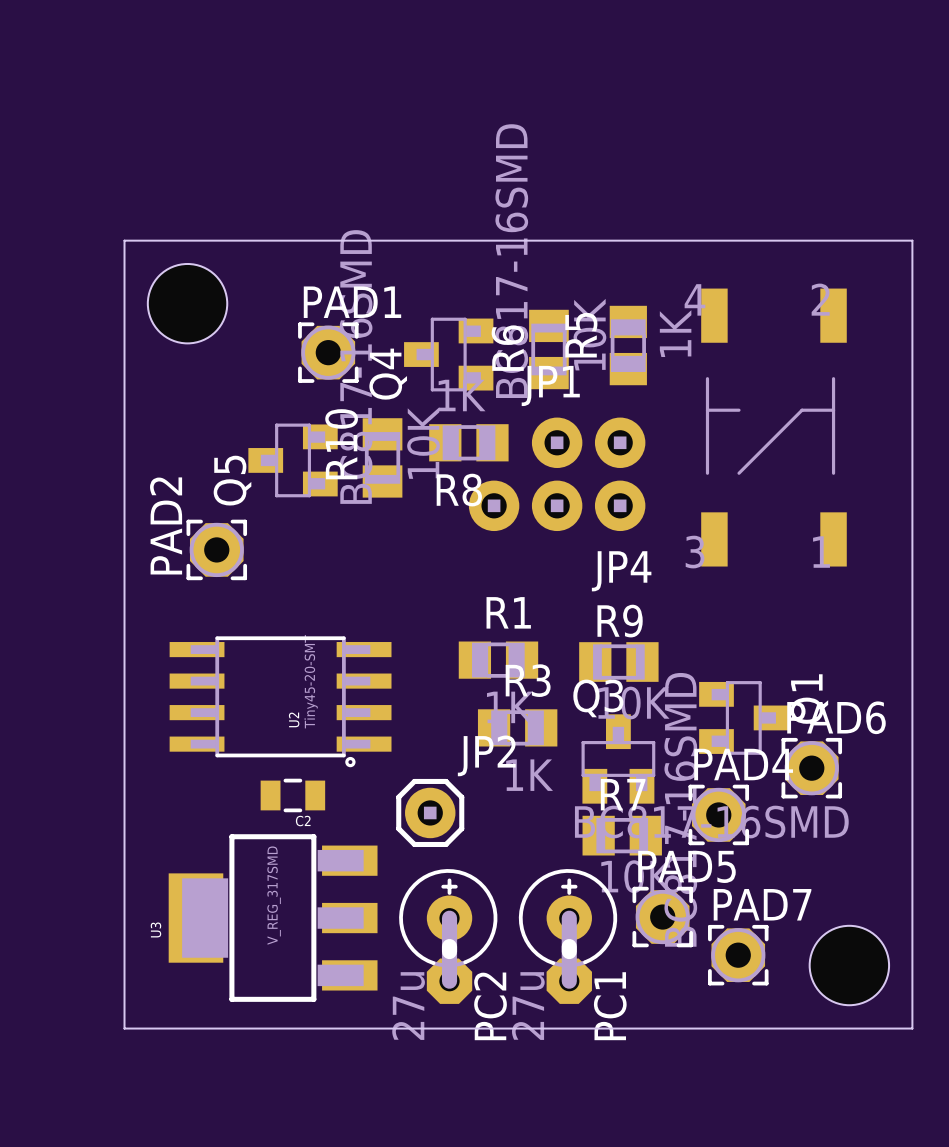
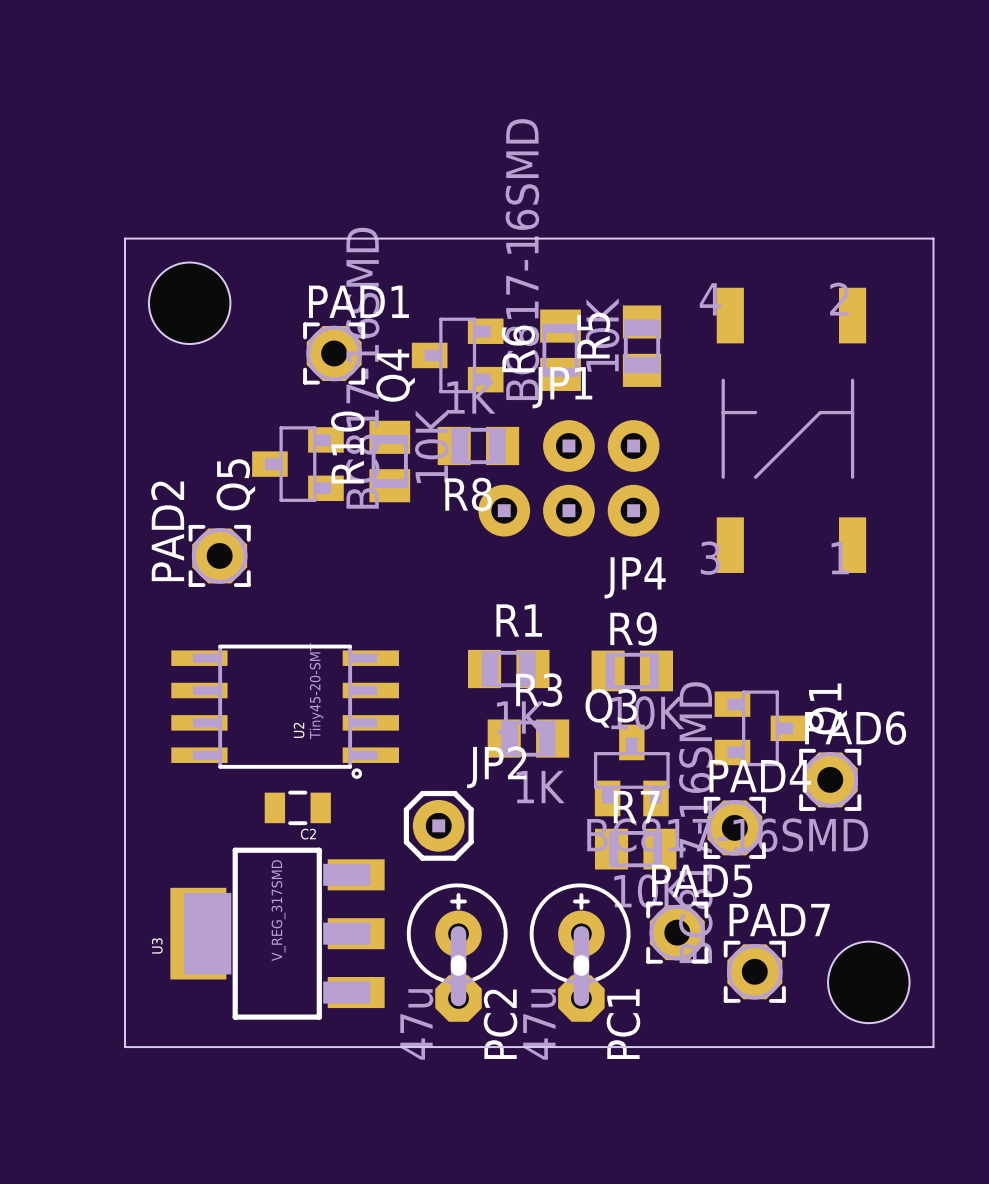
R5 value: 1K (675, 333) -> none
PC2 value: 27u (408, 1006) -> 47u (416, 1024)
PC1 value: 27u (528, 1006) -> 47u (539, 1024)

